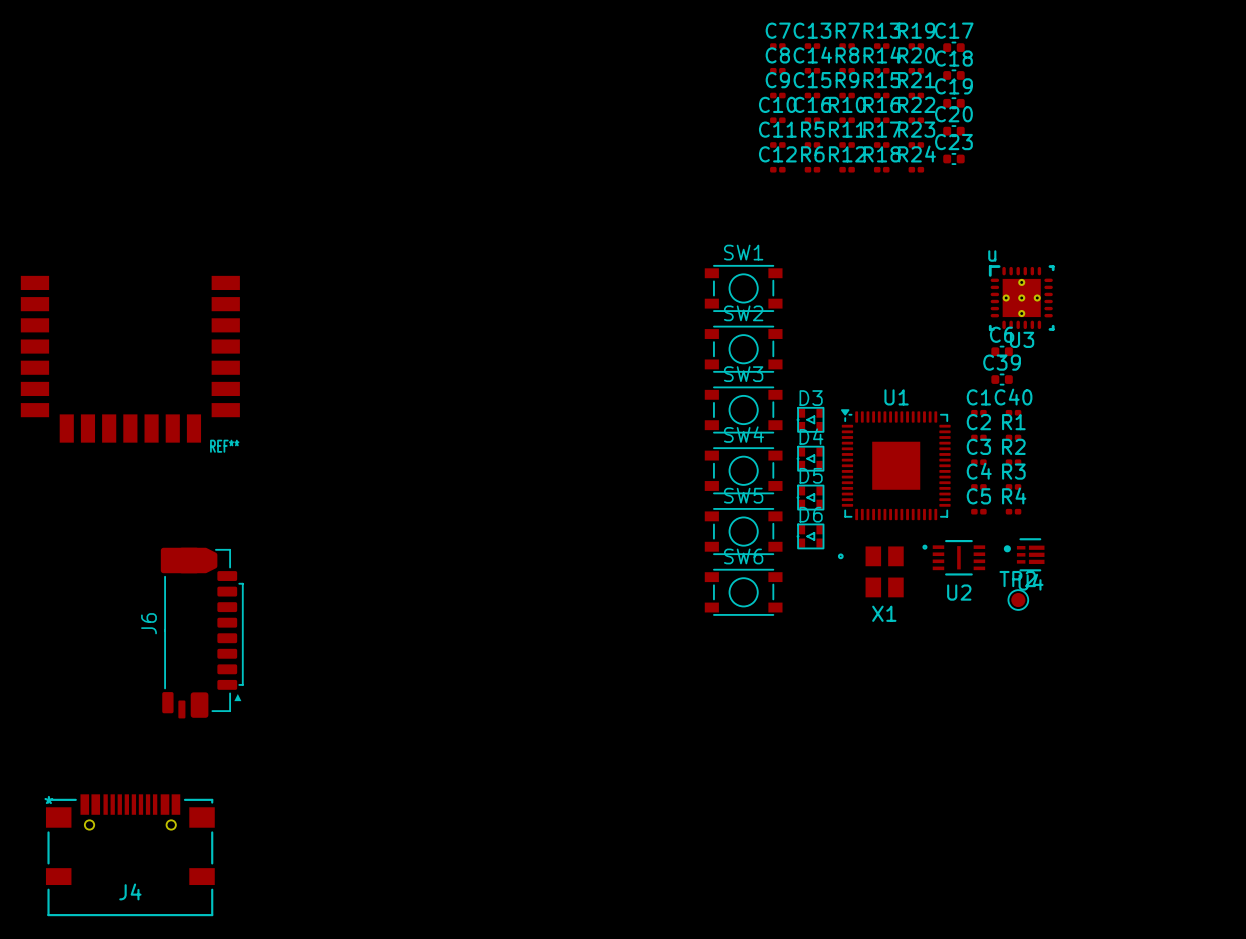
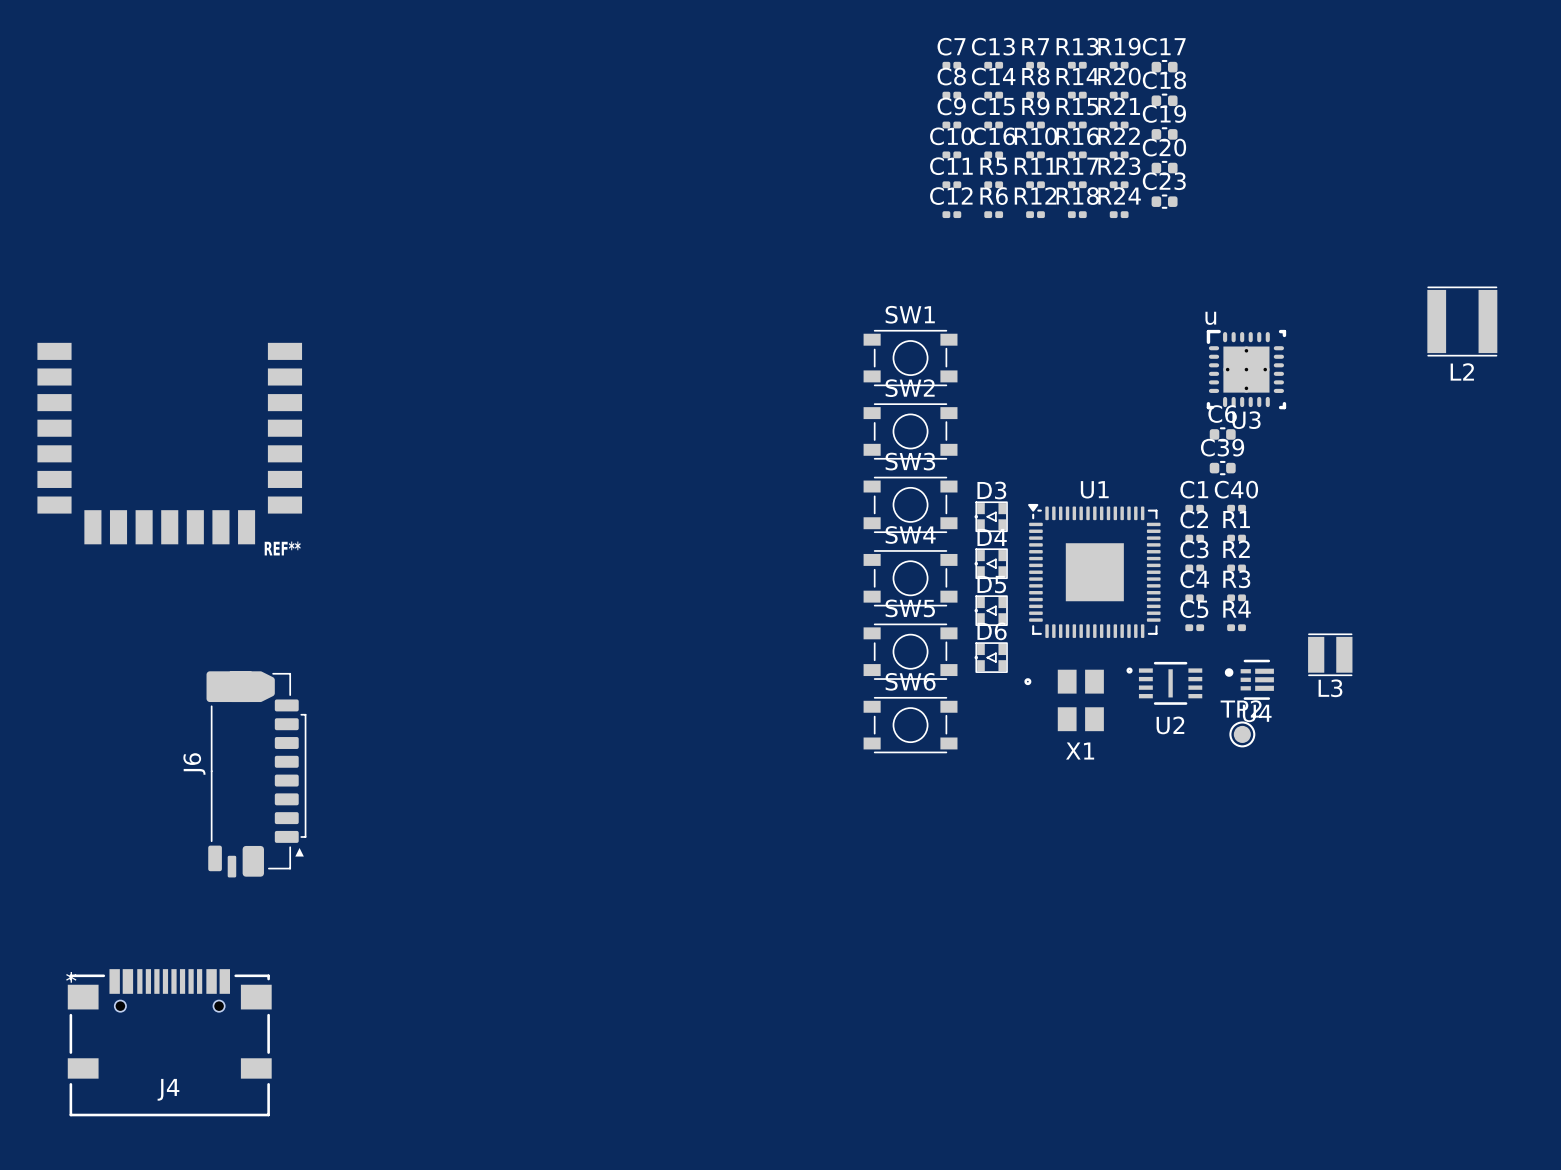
L2: none -> (1462, 321)
L3: none -> (1330, 654)

